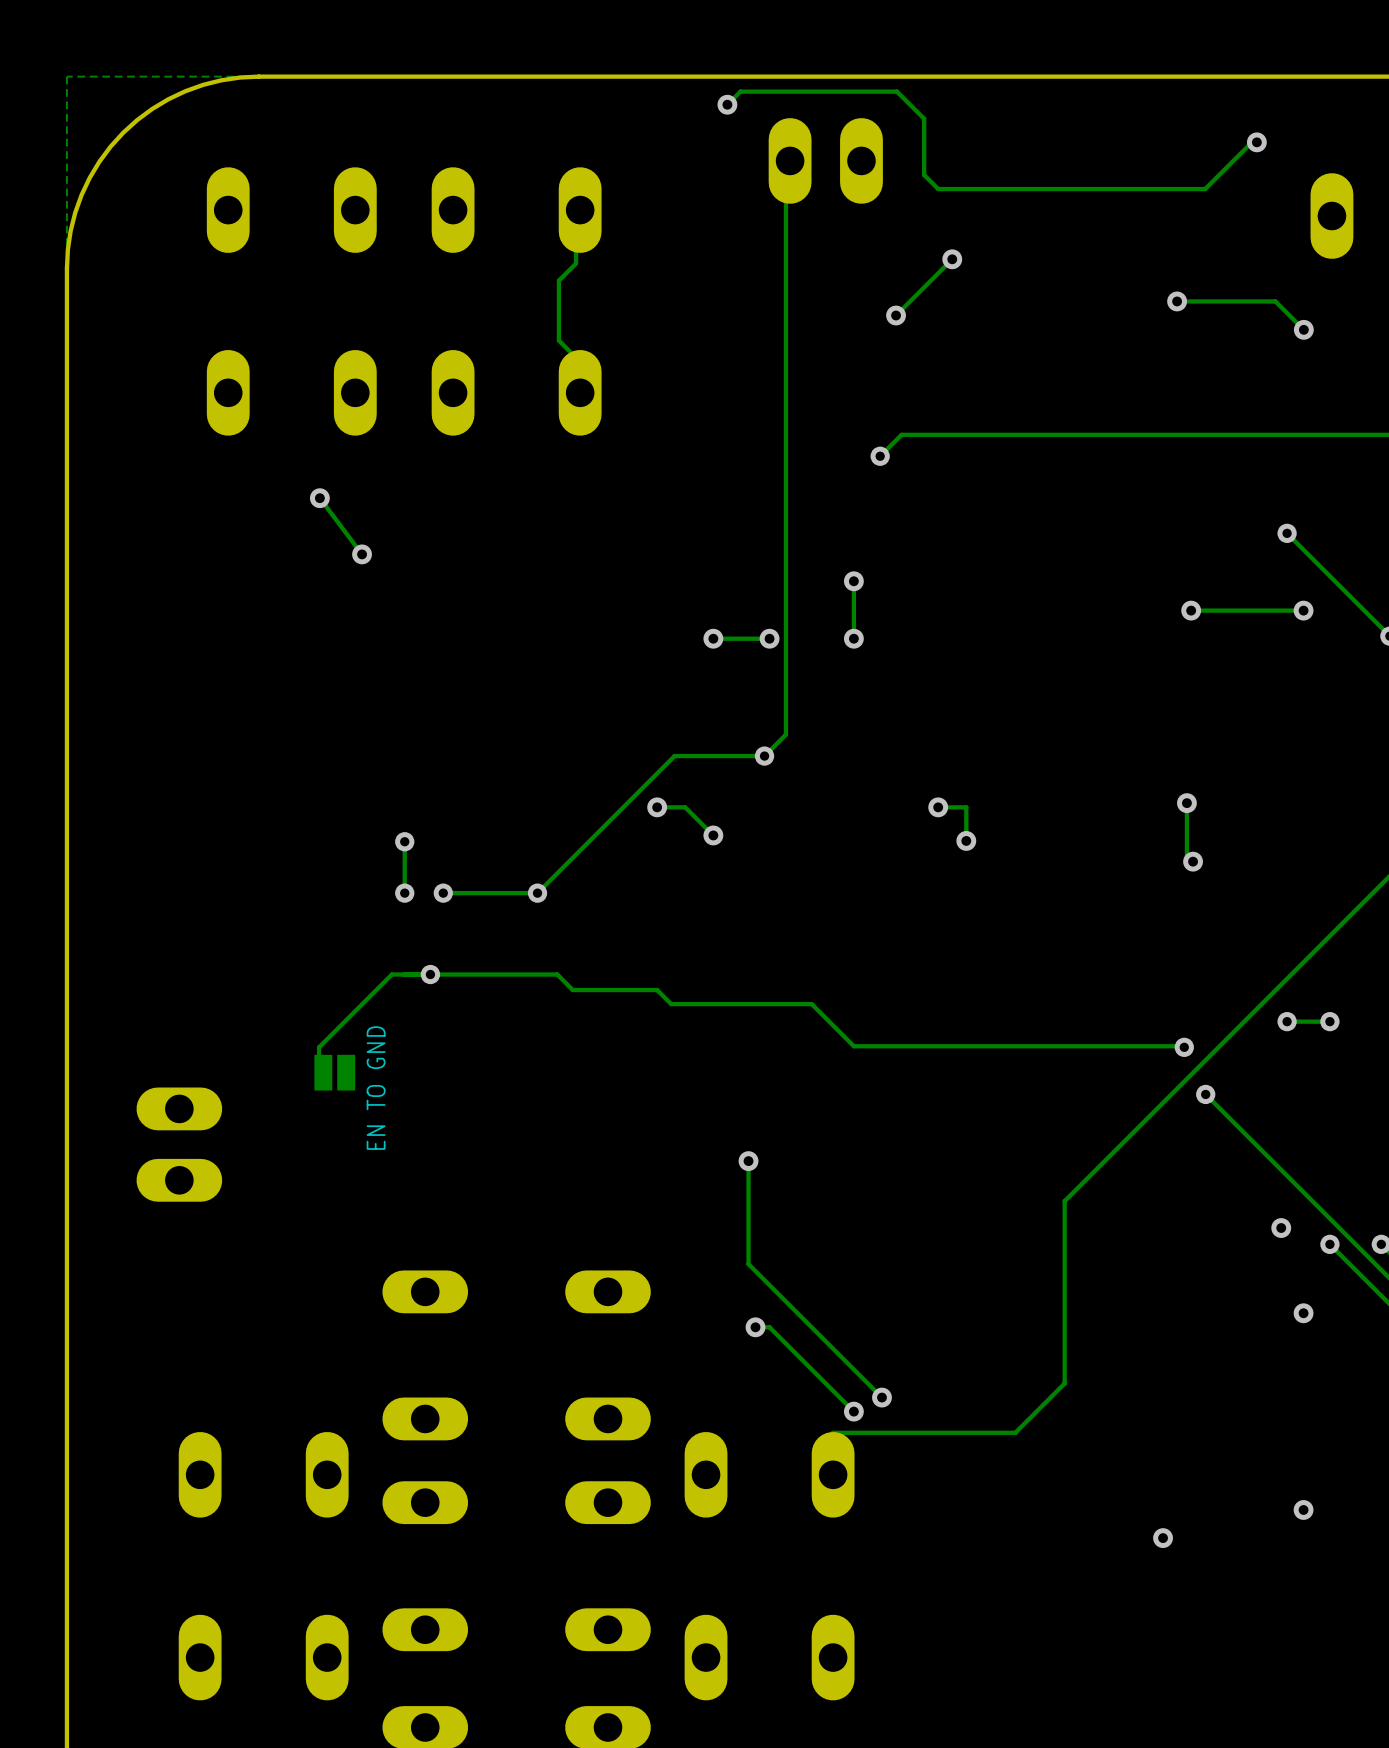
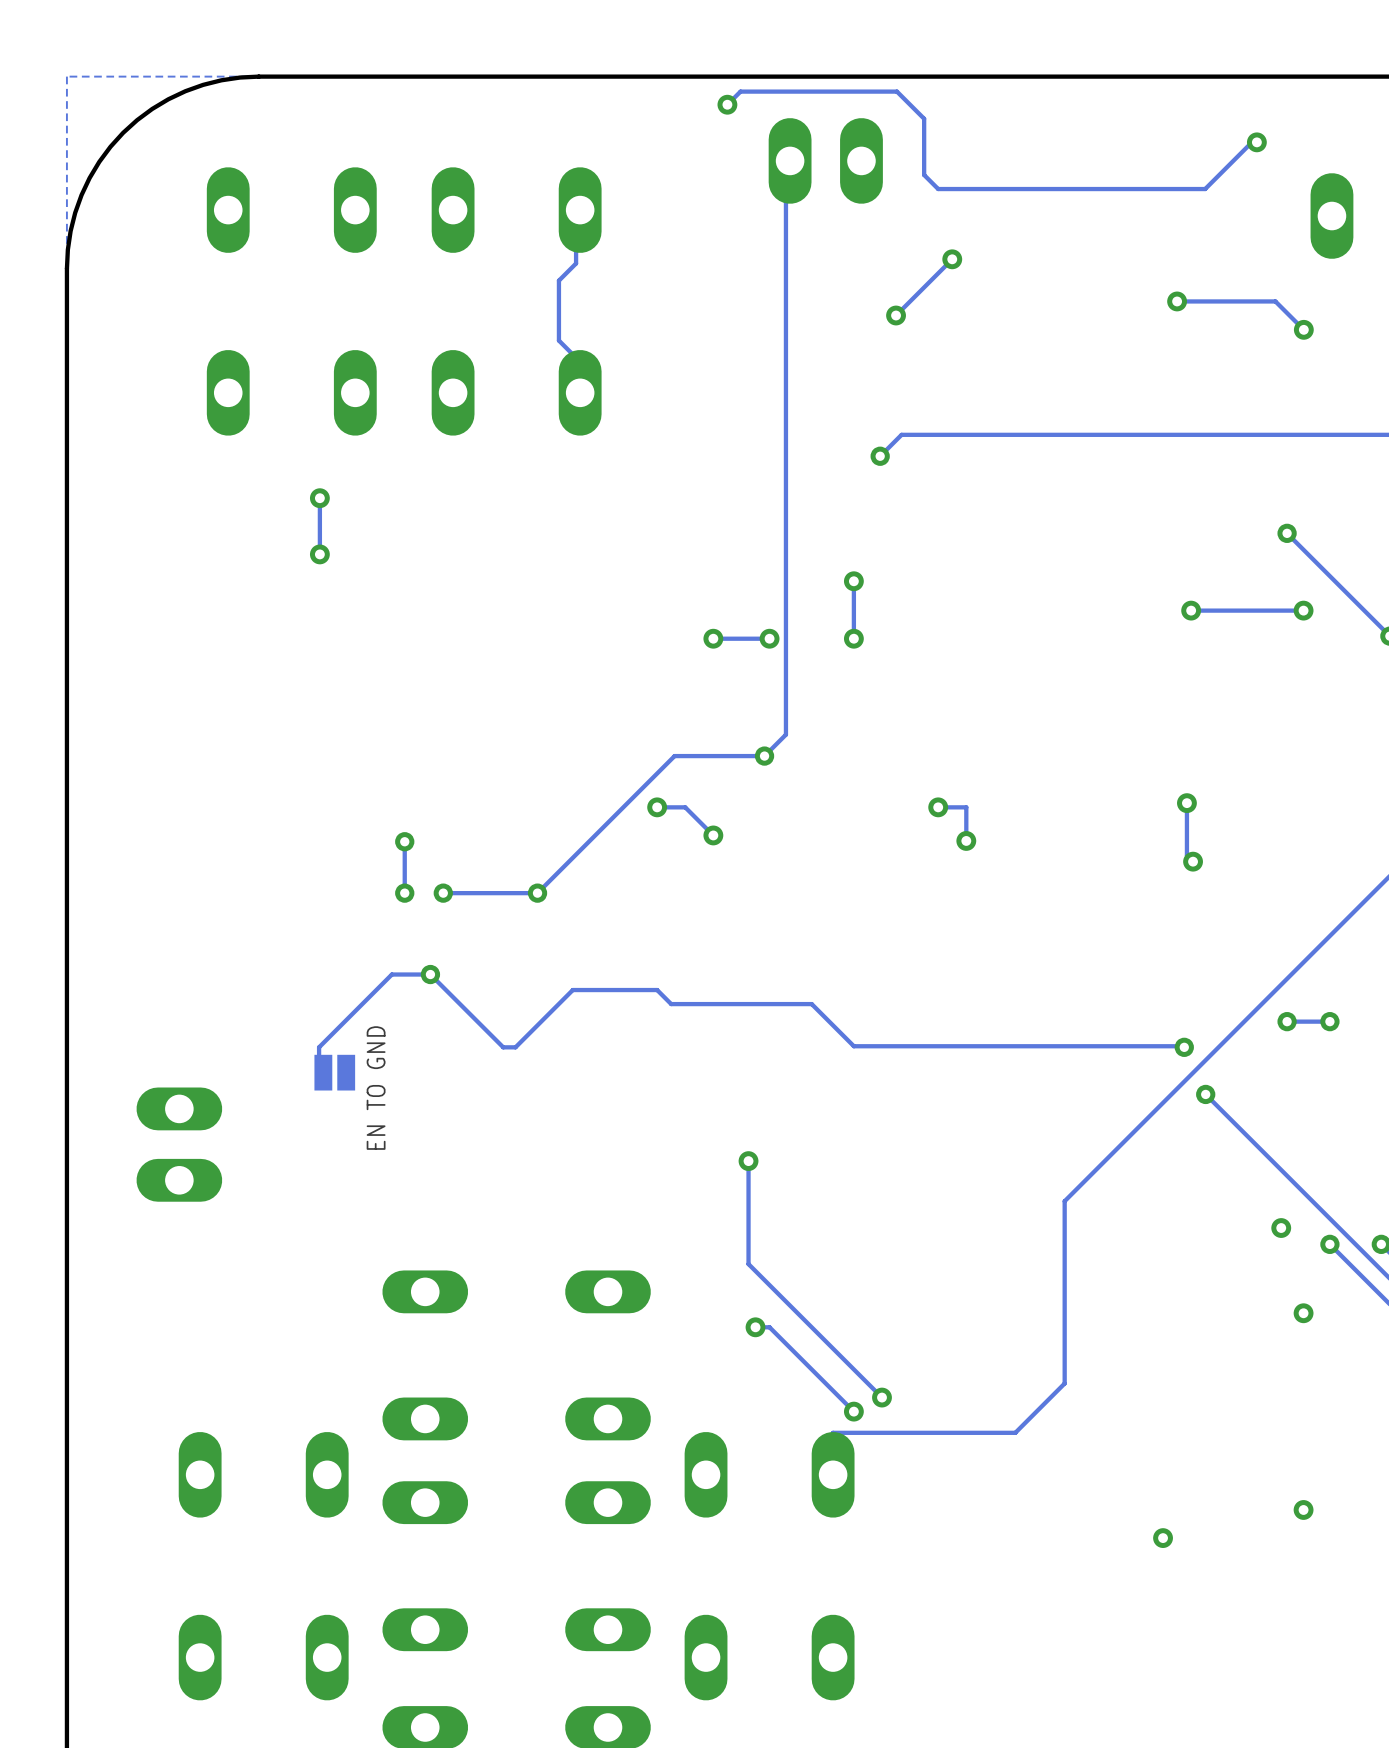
track: (319, 498) (362, 554) -> (319, 498) (319, 554)
via position: (362, 554) -> (319, 554)
track: (430, 974) (557, 974) (572, 990) -> (430, 974) (503, 1047) (515, 1047) (572, 990)

